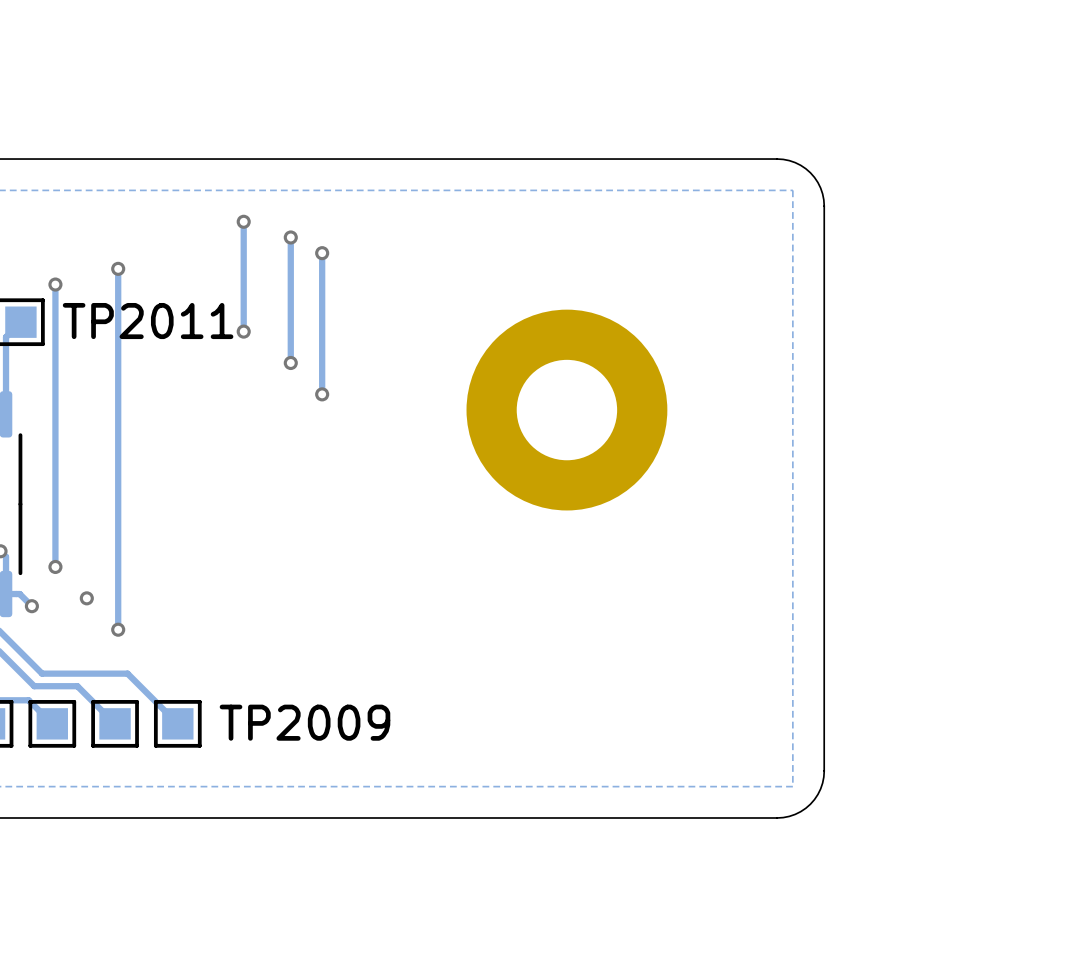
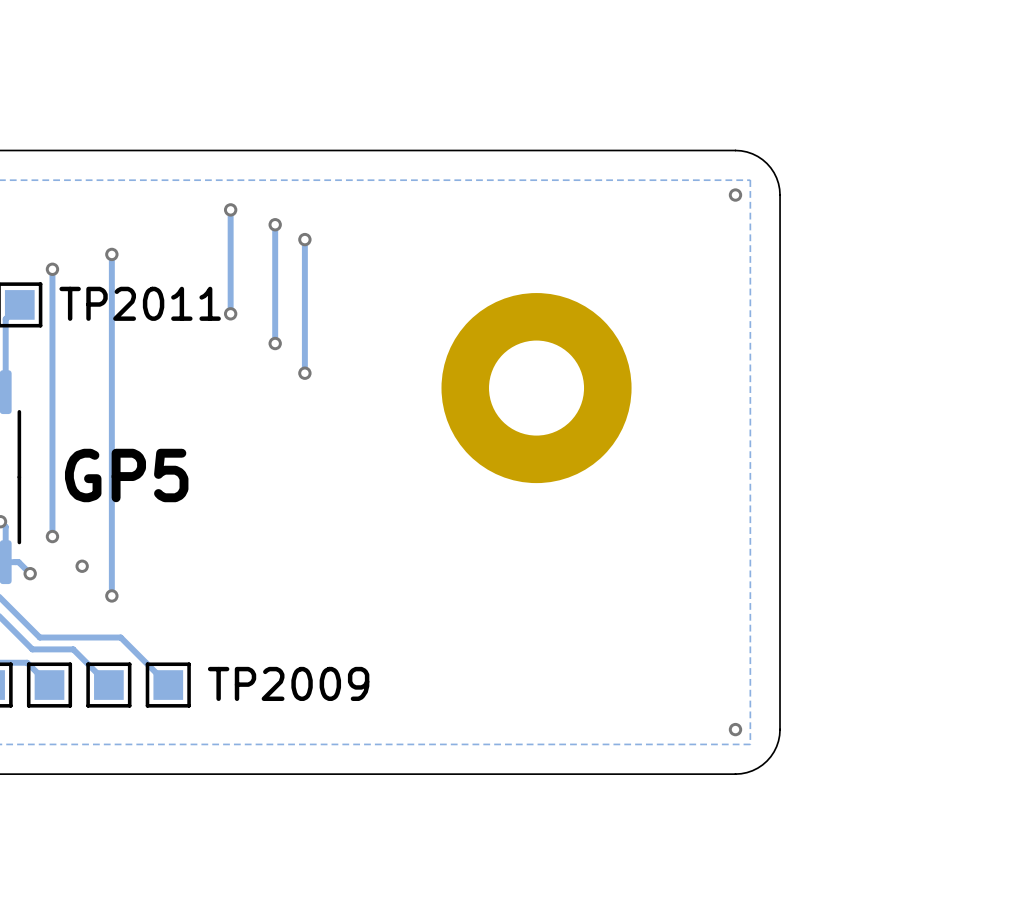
via: none -> (735, 195)
text: none -> GP5 (126, 475)
via: none -> (735, 729)

